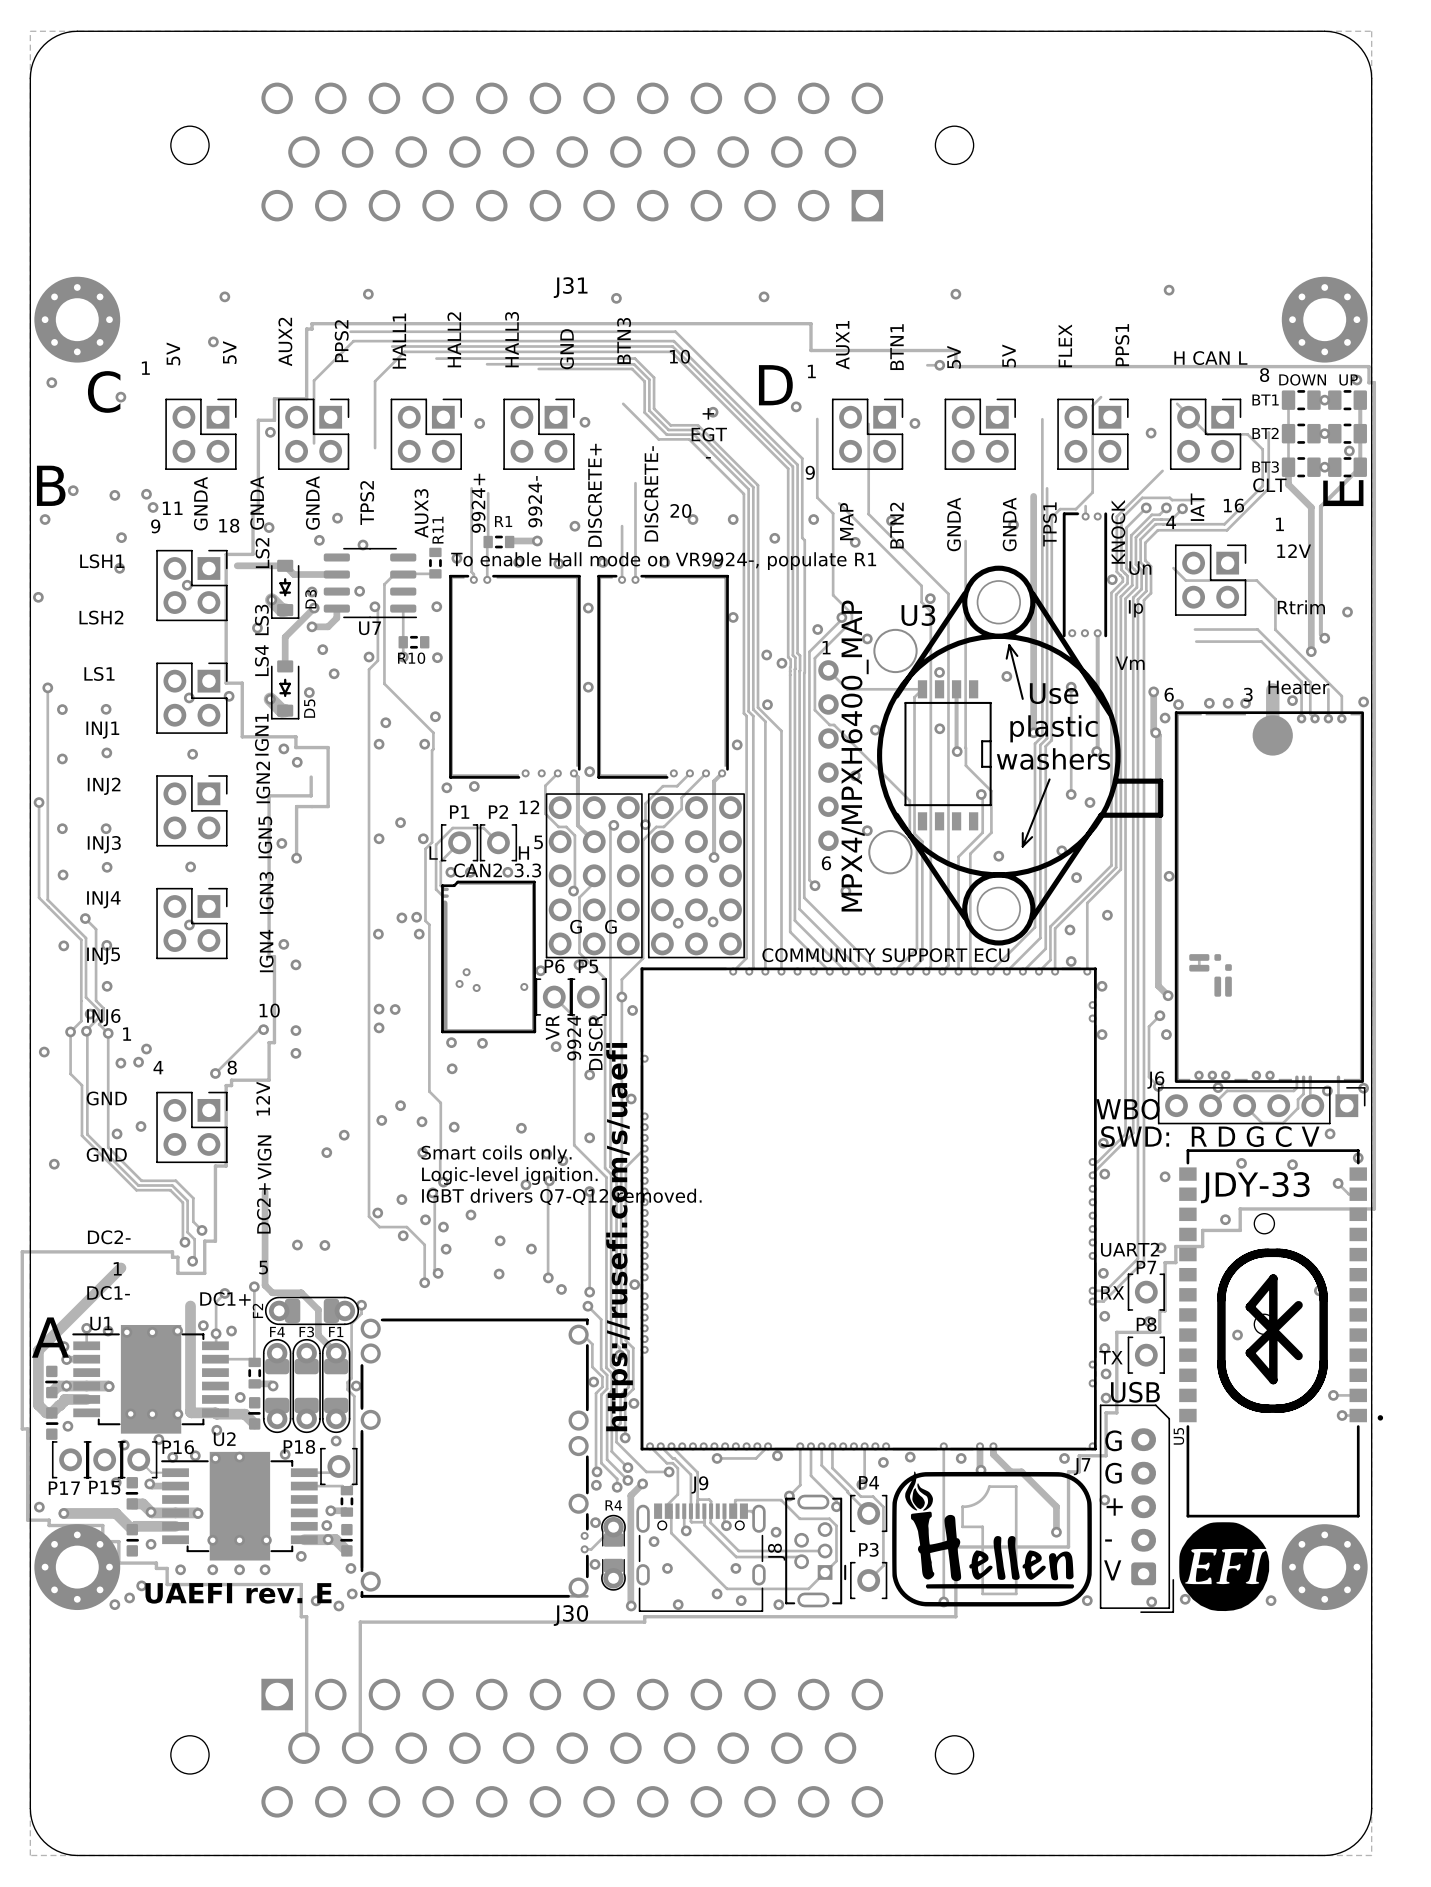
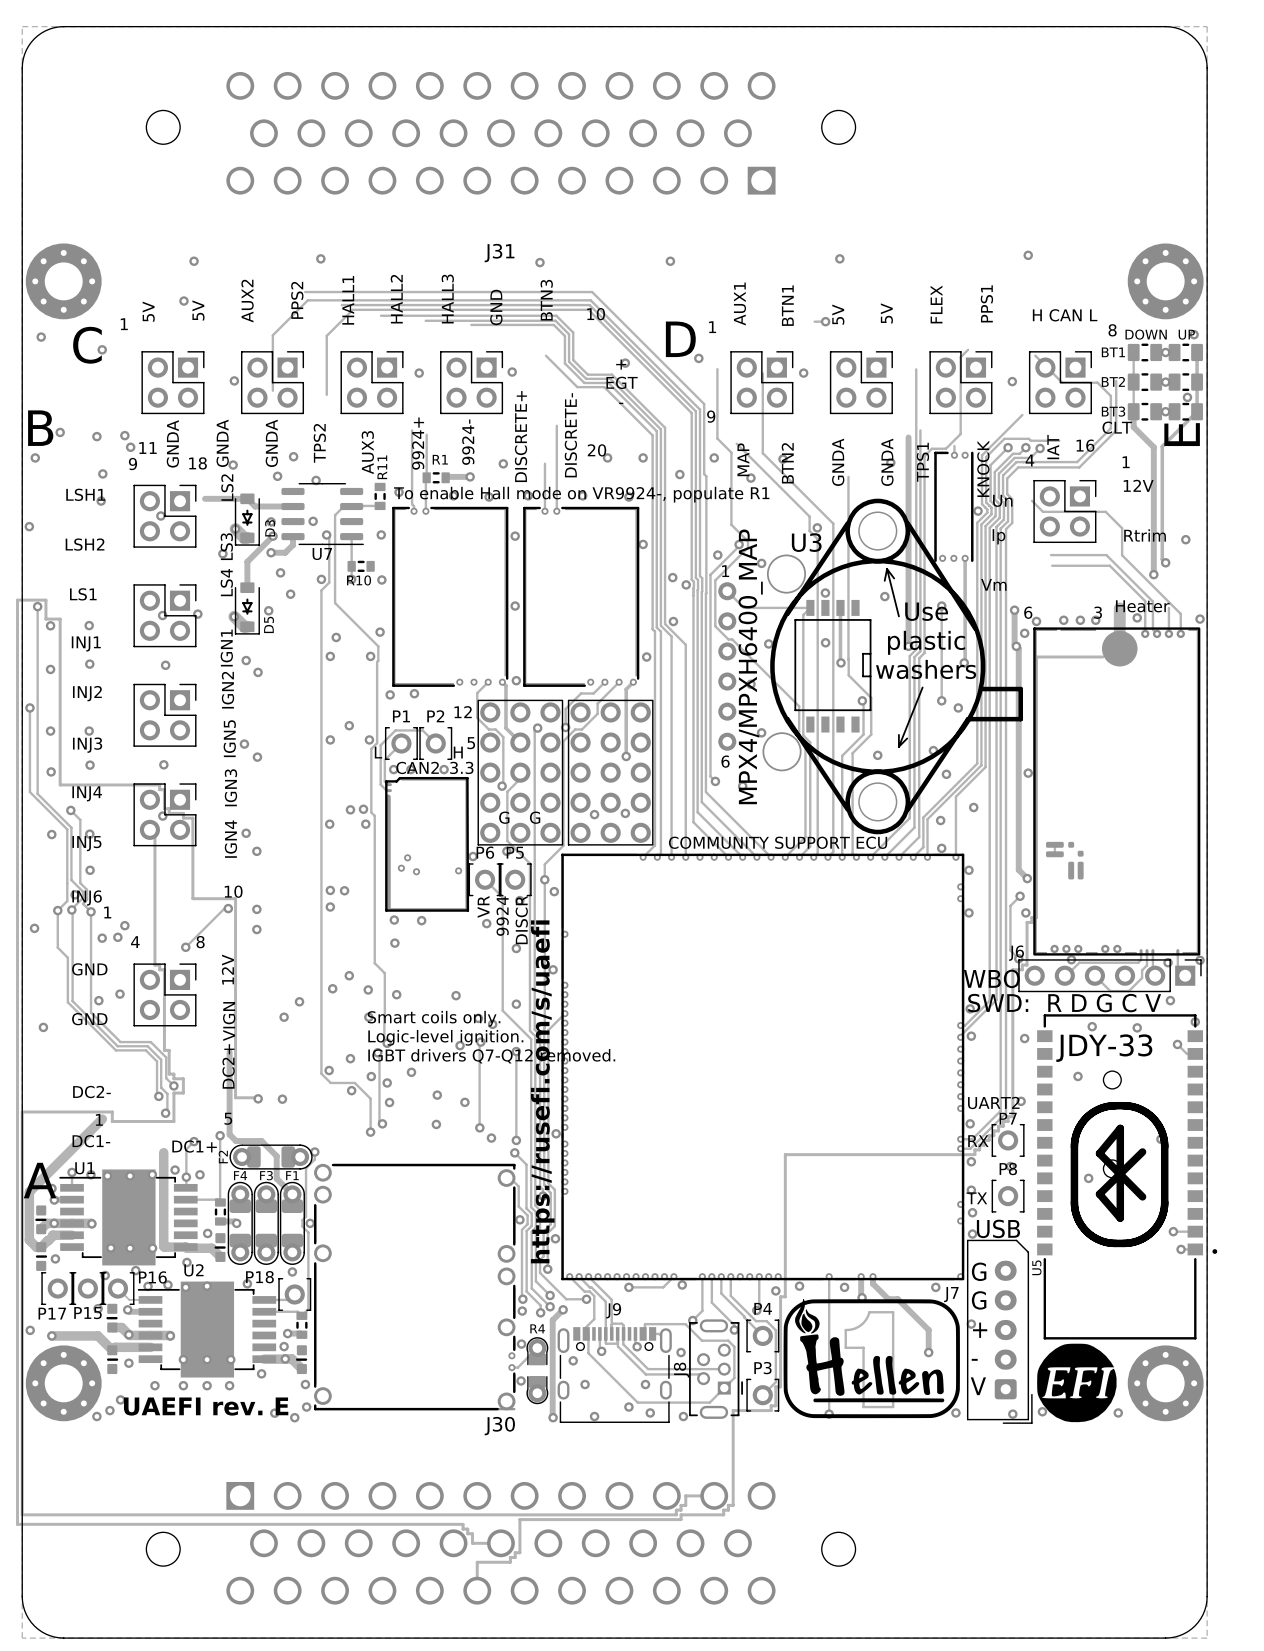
track: none -> (1102, 657) (1036, 657) (1036, 917) (1031, 917) (1031, 922) (1027, 922) (1027, 965) (1022, 965) (1022, 969) (1012, 969) (1012, 1116) (1008, 1116) (1008, 1121) (1003, 1121) (1003, 1126) (998, 1126) (998, 1130) (993, 1130) (993, 1135) (989, 1135) (989, 1140) (984, 1140) (984, 1145) (979, 1145) (979, 1149) (974, 1149) (974, 1154) (785, 1154) (785, 1296) (780, 1296) (780, 1386) (775, 1386) (775, 1405) (771, 1405) (771, 1410) (733, 1410) (733, 1505) (728, 1505) (728, 1510) (723, 1510) (723, 1514) (681, 1514) (681, 1519) (519, 1519) (519, 1552) (515, 1552) (515, 1557) (510, 1557) (510, 1562) (477, 1562) (477, 1590)
track: (311, 777) (311, 795) (269, 795) (269, 956) (274, 956) (274, 1042) (269, 1042) (269, 1080) (231, 1080) (231, 1085) (226, 1085) (226, 1166) (215, 1166) (215, 1241) (204, 1241) (204, 1273) (177, 1273) (177, 1257) (172, 1257) (172, 1251) (22, 1251) (22, 1428) (27, 1428) (27, 1520) (49, 1520) (49, 1525) (102, 1525) (102, 1541) (118, 1541) (118, 1563) (156, 1563) (156, 1568) (167, 1568) (167, 1584) (301, 1584) (301, 1616) (306, 1616) (306, 1748) (303, 1748) -> none
track: (296, 858) (296, 806) (328, 806) (328, 747) (295, 747) (295, 736) (242, 736) (242, 683) (226, 683) (226, 554) (253, 554) (253, 511) (258, 511) (258, 420) (274, 420) (274, 398) (306, 398) (306, 329) (312, 329) (312, 323) (810, 323) (810, 350) (955, 350) (955, 366) (1368, 366) (1368, 382) (1374, 382) (1374, 1208) (1240, 1208) (1240, 1230) (1202, 1230) (1202, 1246) (1175, 1246) (1175, 1262) (1165, 1262) (1165, 1310) (1159, 1310) (1159, 1332) (1116, 1332) (1116, 1412) (1106, 1412) (1106, 1455) (1079, 1455) (1079, 1471) (1068, 1471) (1068, 1546) (955, 1546) (955, 1616) (644, 1616) (644, 1622) (360, 1622) (360, 1748) (357, 1748) -> none
track: none -> (154, 837) (154, 965) (159, 965) (159, 969) (164, 969) (164, 1050) (169, 1050) (169, 1074) (173, 1074) (173, 1078) (183, 1078) (183, 1093) (173, 1093) (173, 1121) (112, 1121) (112, 1111) (22, 1111) (22, 1514) (676, 1514) (676, 1510) (681, 1510) (681, 1505) (685, 1505) (685, 1495) (714, 1495)
track: none -> (254, 1097) (235, 1097) (235, 898) (192, 898) (192, 818) (183, 818) (183, 813) (169, 813) (169, 808) (164, 808) (164, 789) (159, 789) (159, 784) (60, 784) (60, 619) (45, 619) (45, 600) (17, 600) (17, 1524) (463, 1524) (463, 1529) (467, 1529) (467, 1533) (472, 1533) (472, 1543) (500, 1543)

